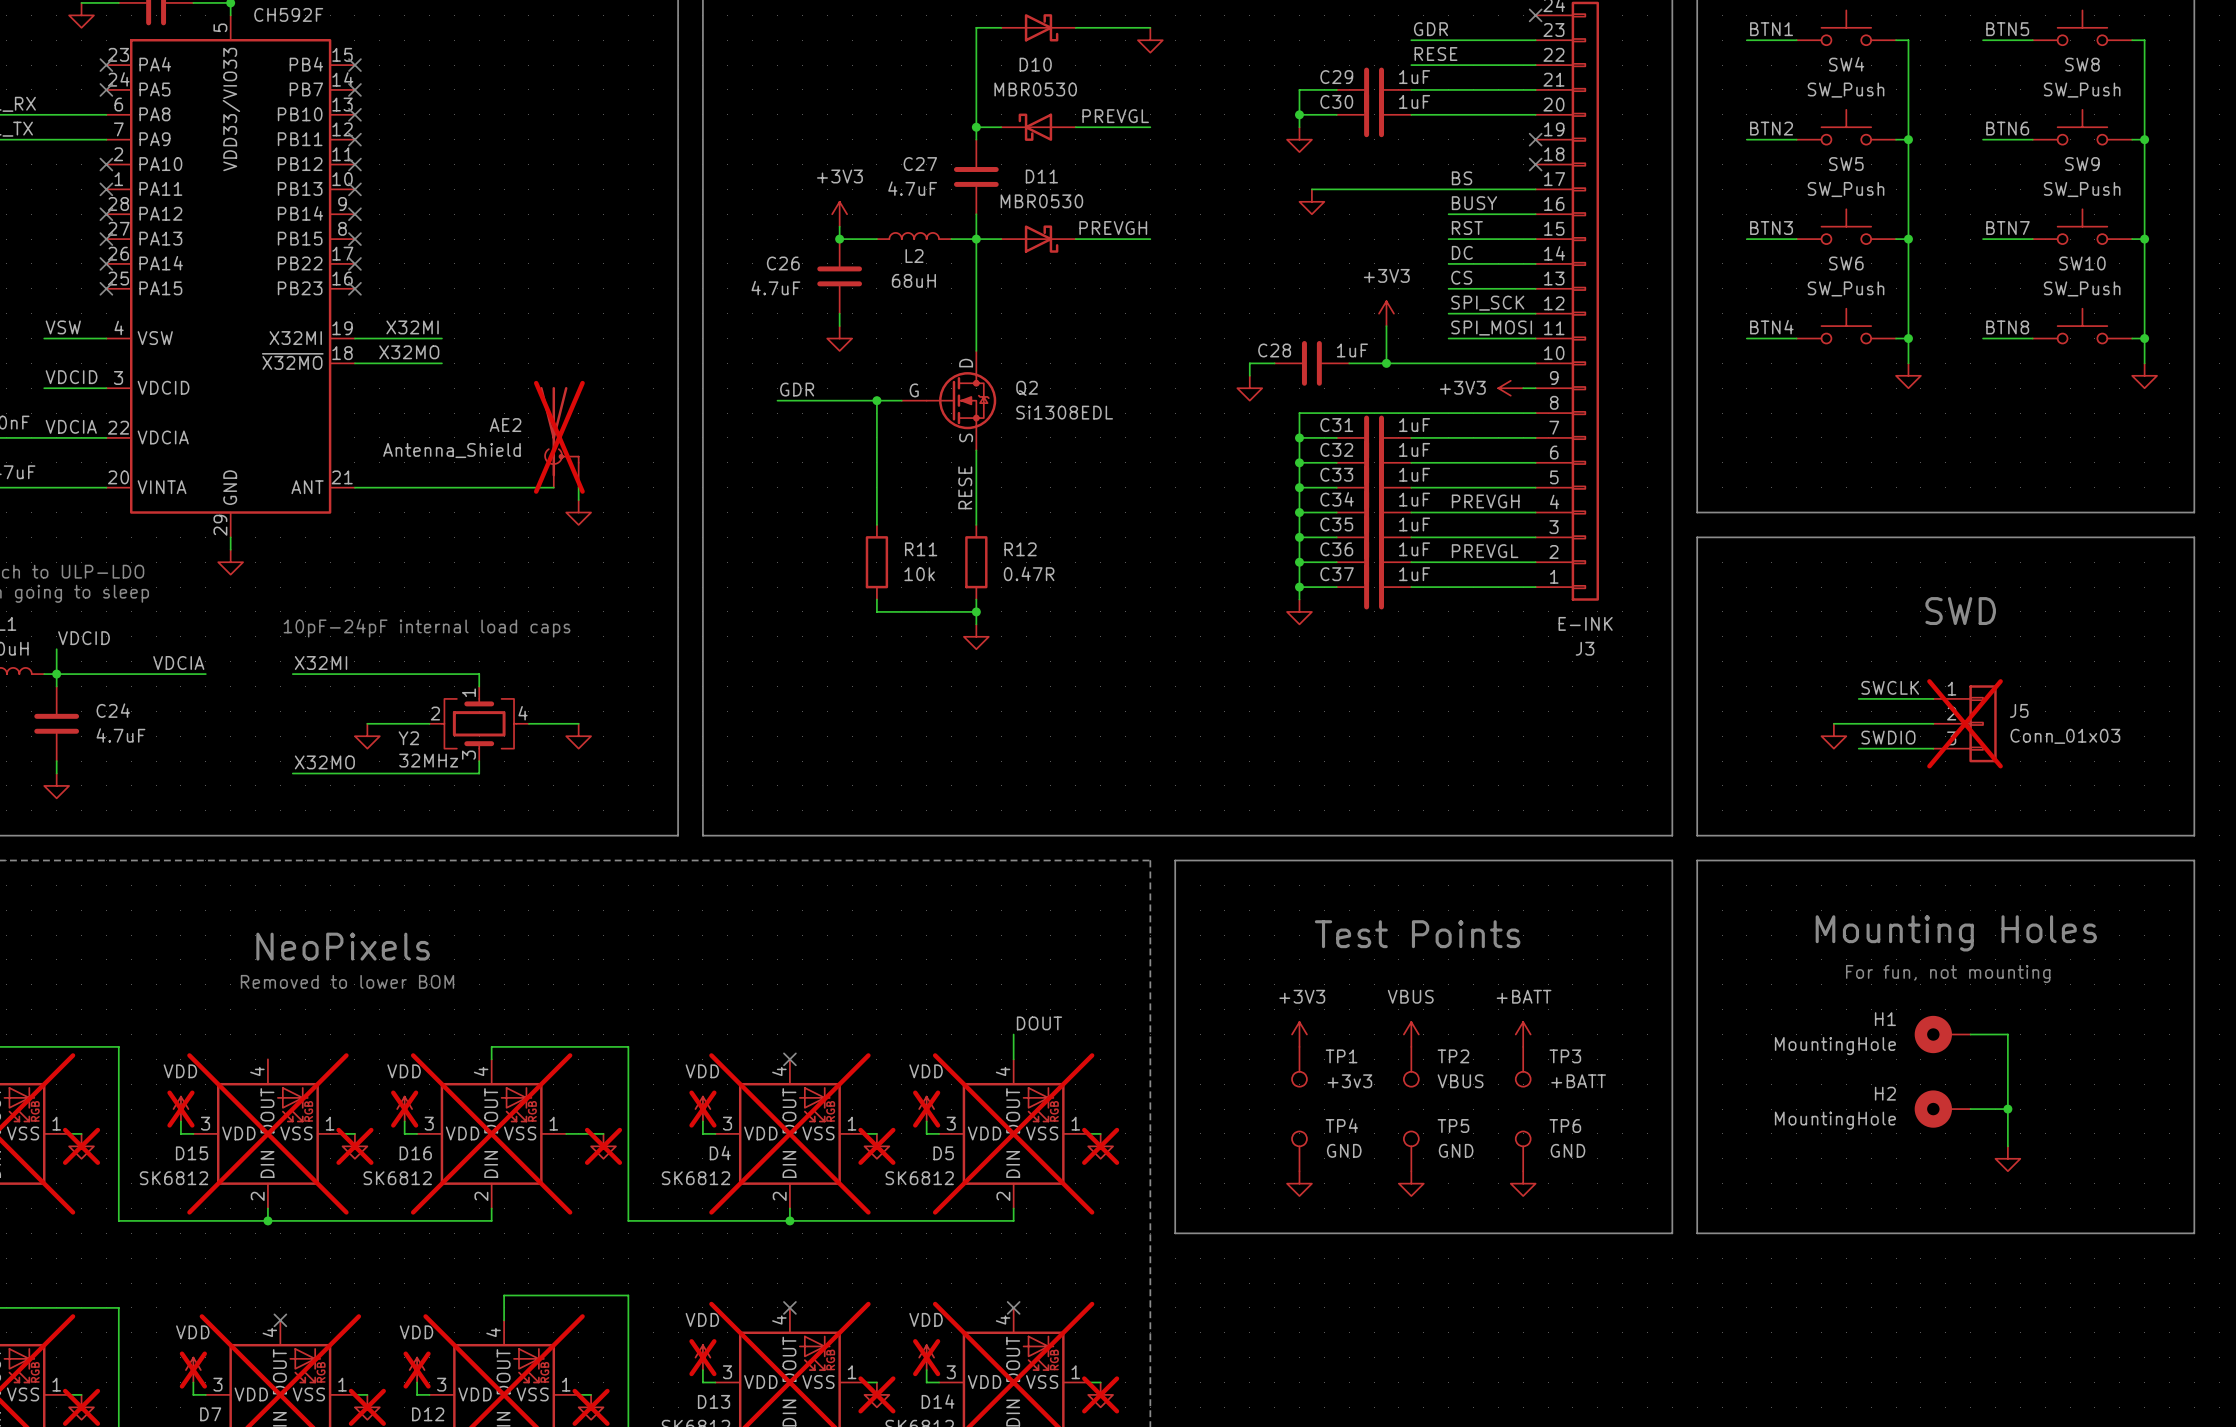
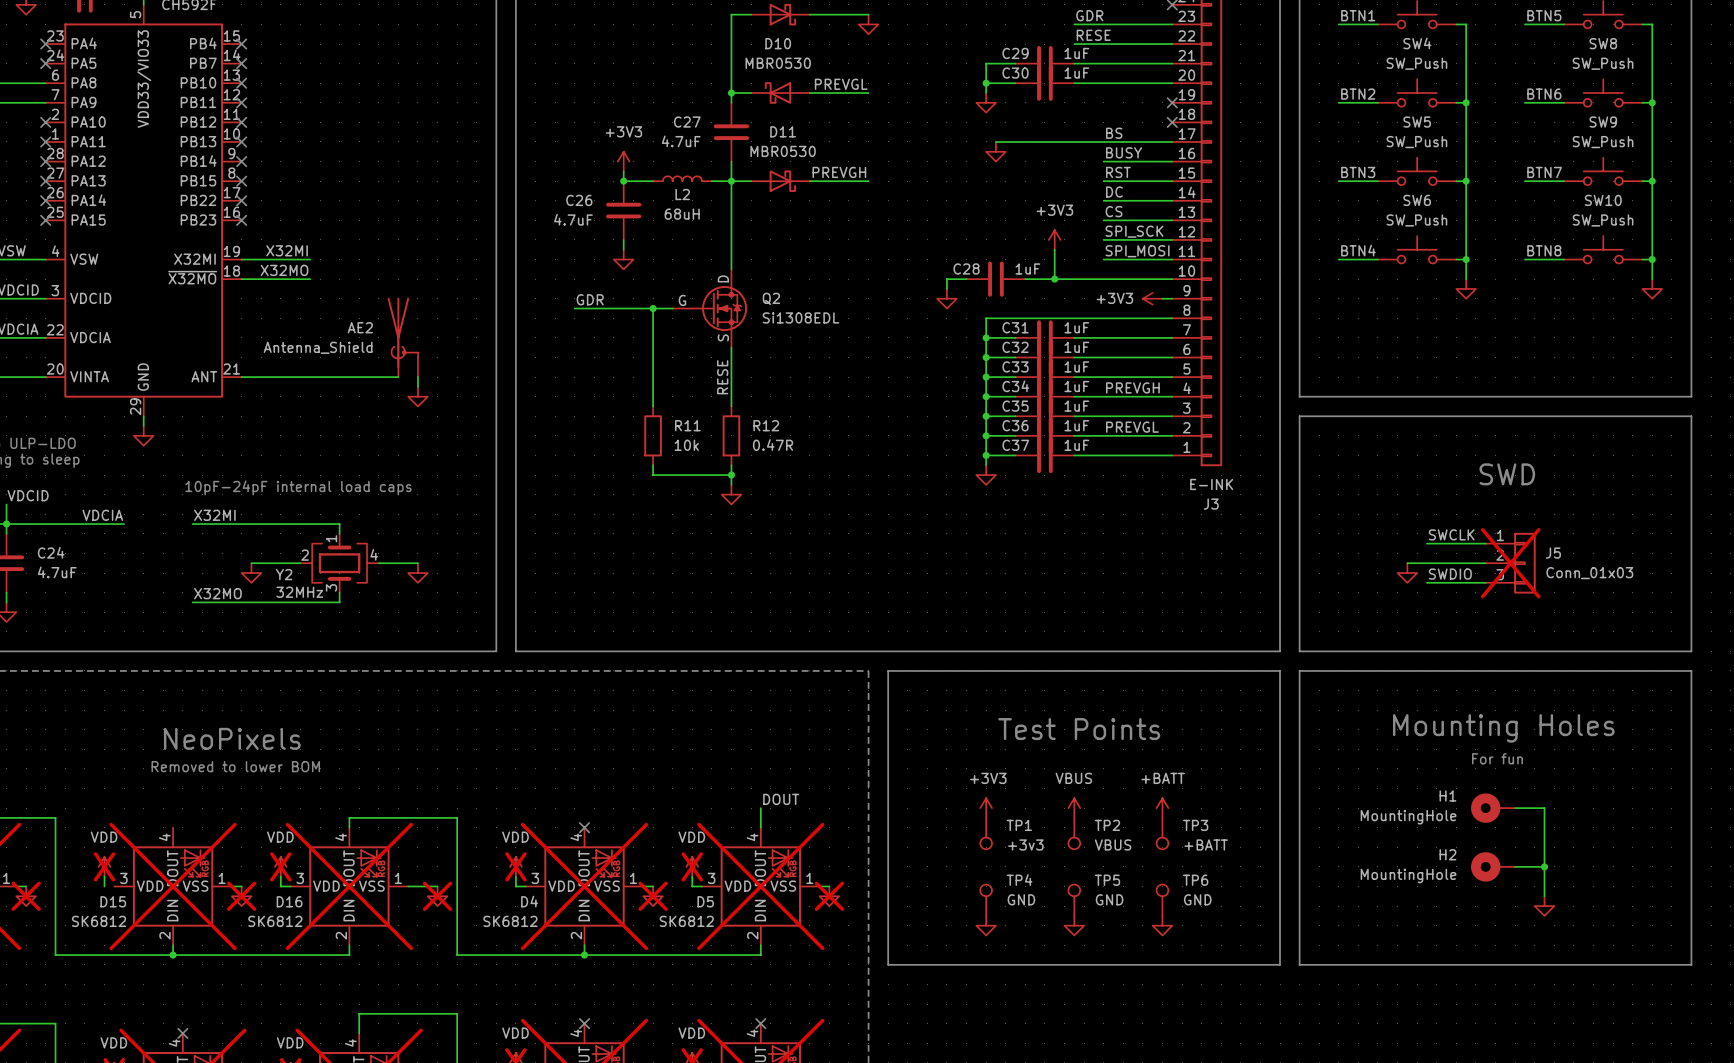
AE2 do-not-place cross: (559, 437) -> none
text: For fun, not mounting (1948, 974) -> For fun (1497, 758)
wire: (180, 1133) (193, 1133) -> none

